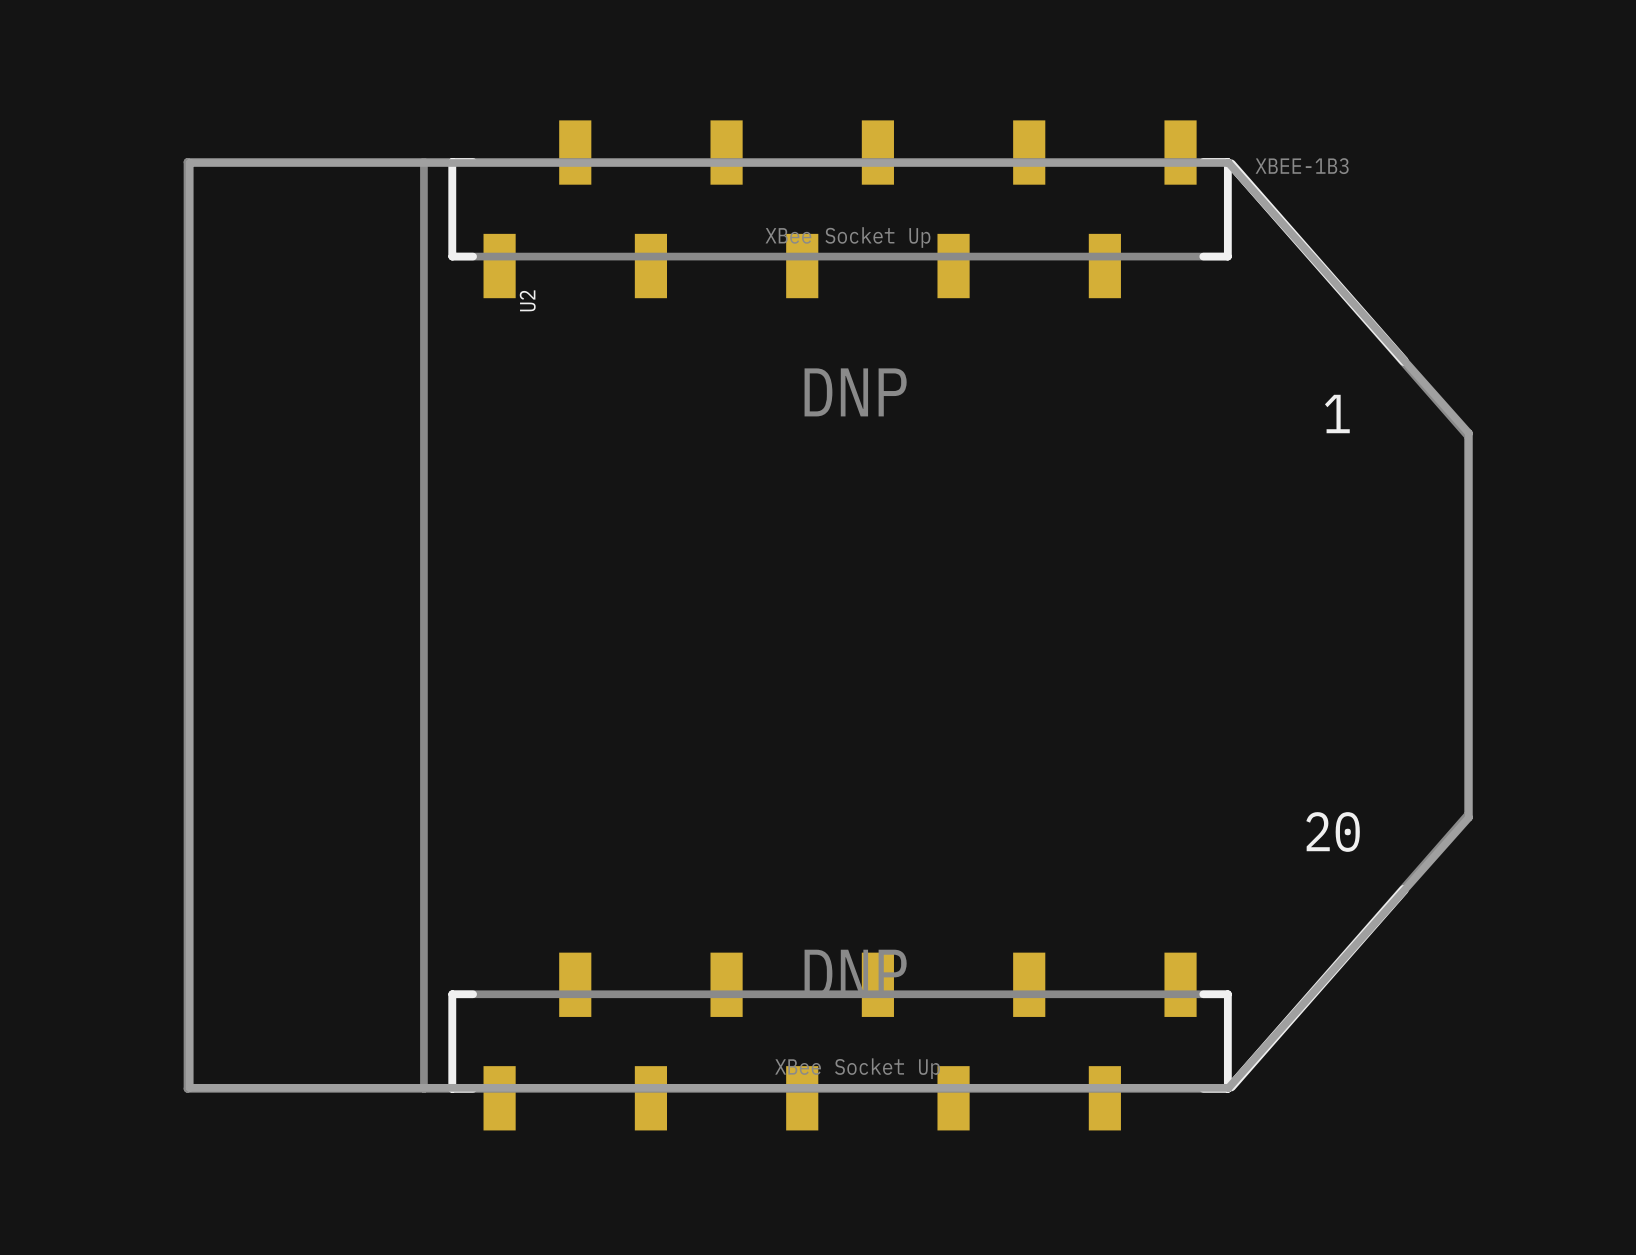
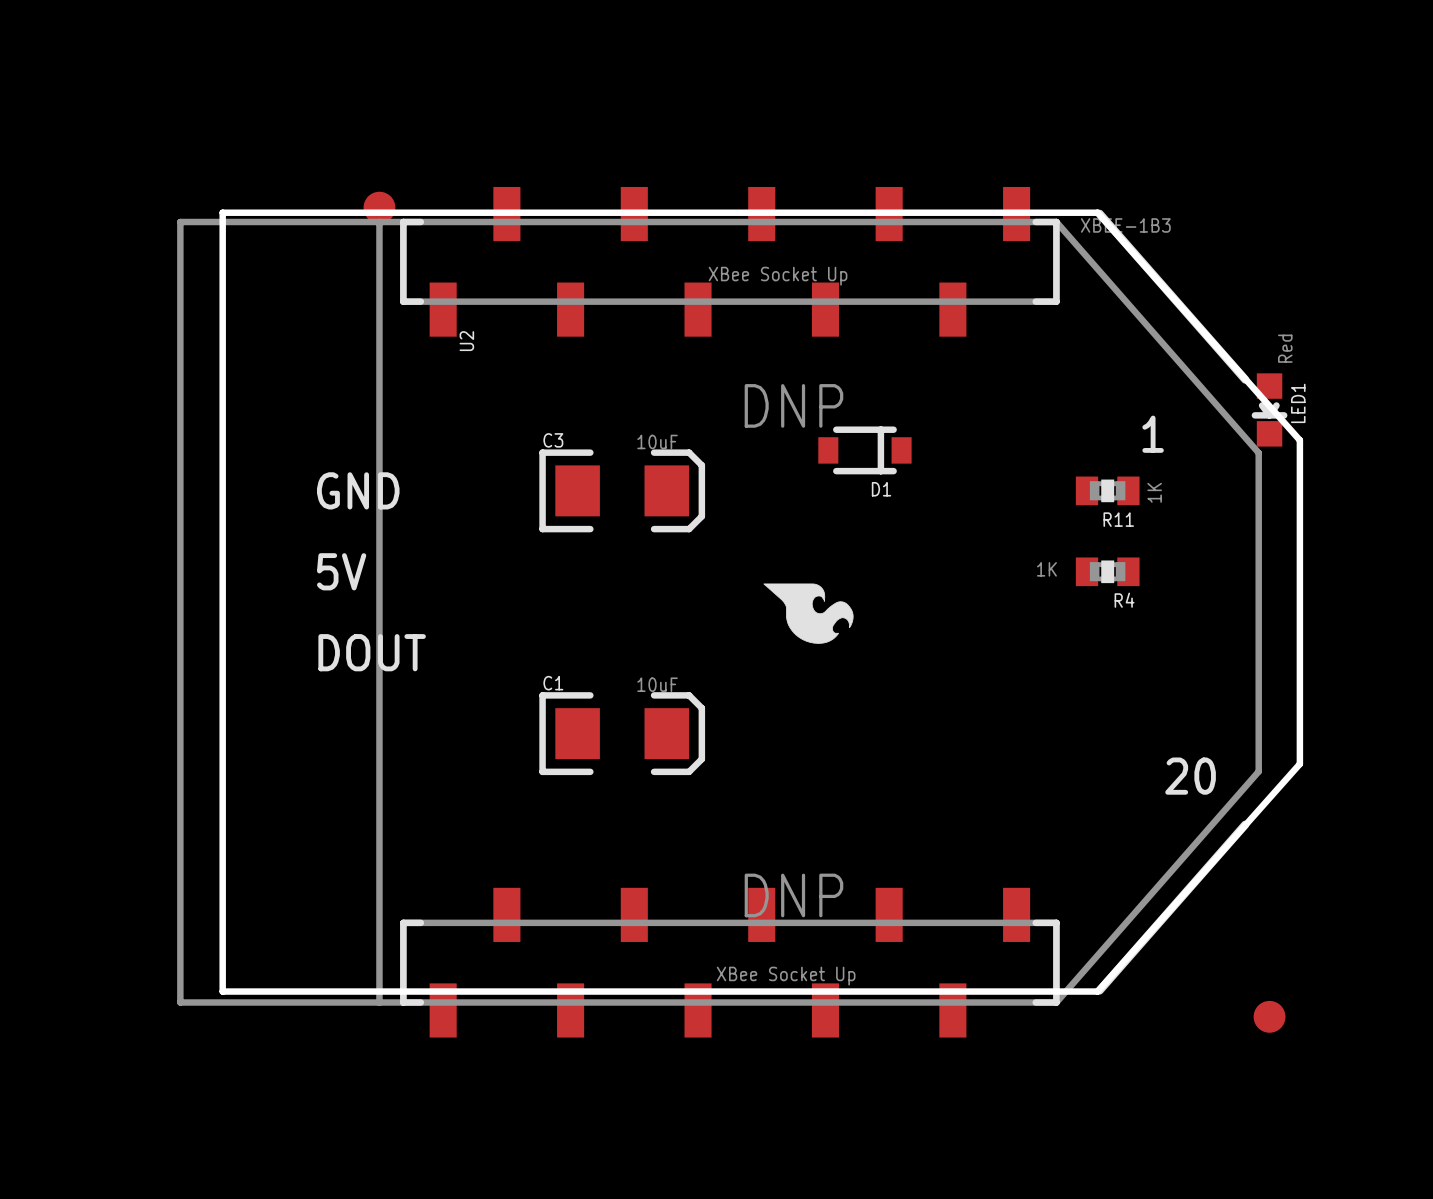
part: none -> (379, 207)
LED1: none -> Red (1269, 409)
text position: 1 (1337, 414) -> 1 (1153, 434)
D1: none -> (864, 450)
text: none -> GND (358, 490)
C3: none -> 10uF (622, 490)
R11: none -> 1K (1107, 490)
text: none -> 5V (341, 571)
R4: none -> 1K (1107, 571)
drawing: none -> [763, 583, 854, 644]
U2 position: (827, 625) -> (719, 612)
text: none -> DOUT (372, 652)
C1: none -> 10uF (622, 733)
part: none -> (1269, 1016)

